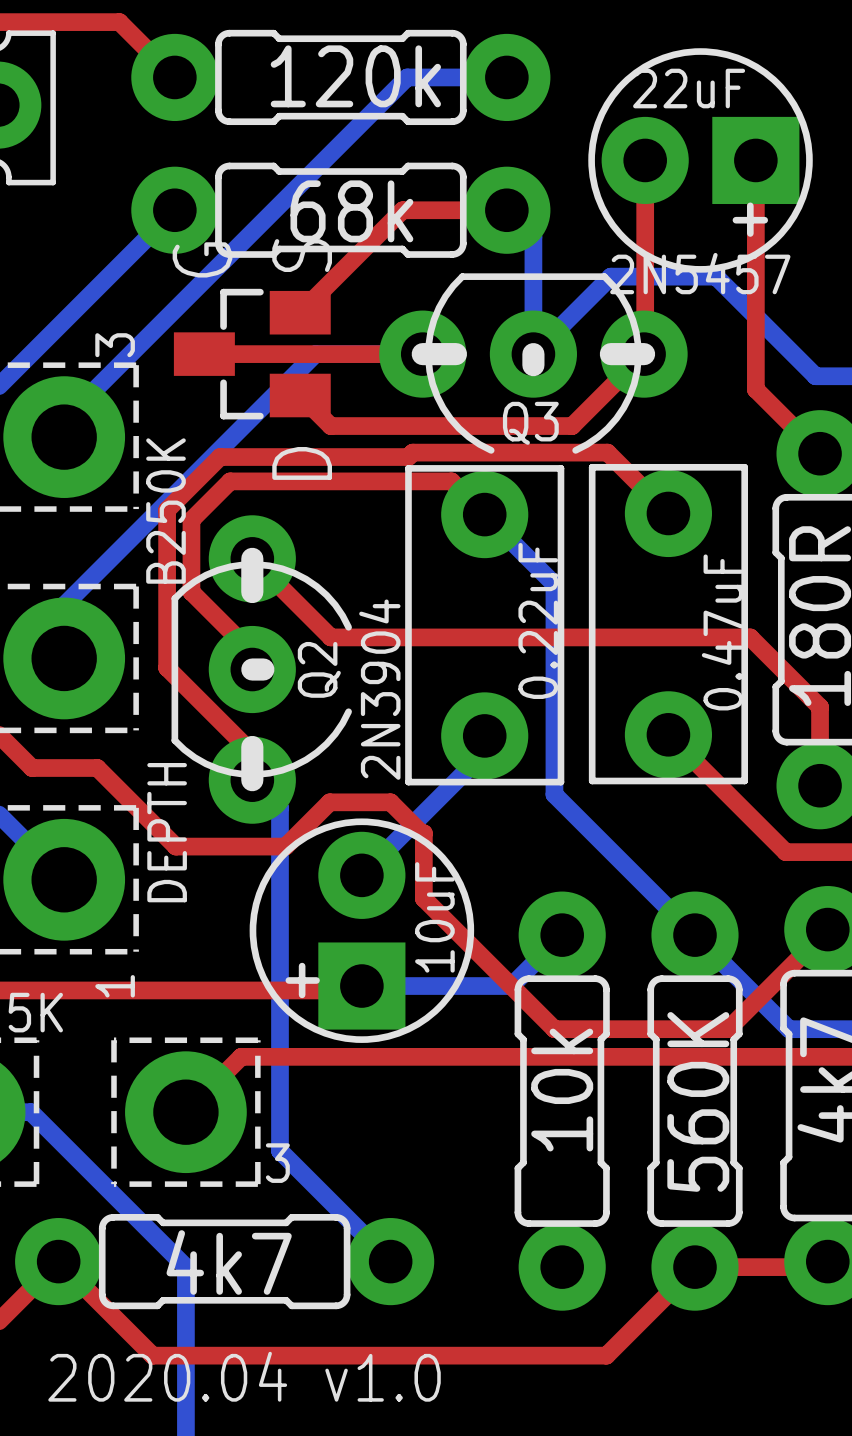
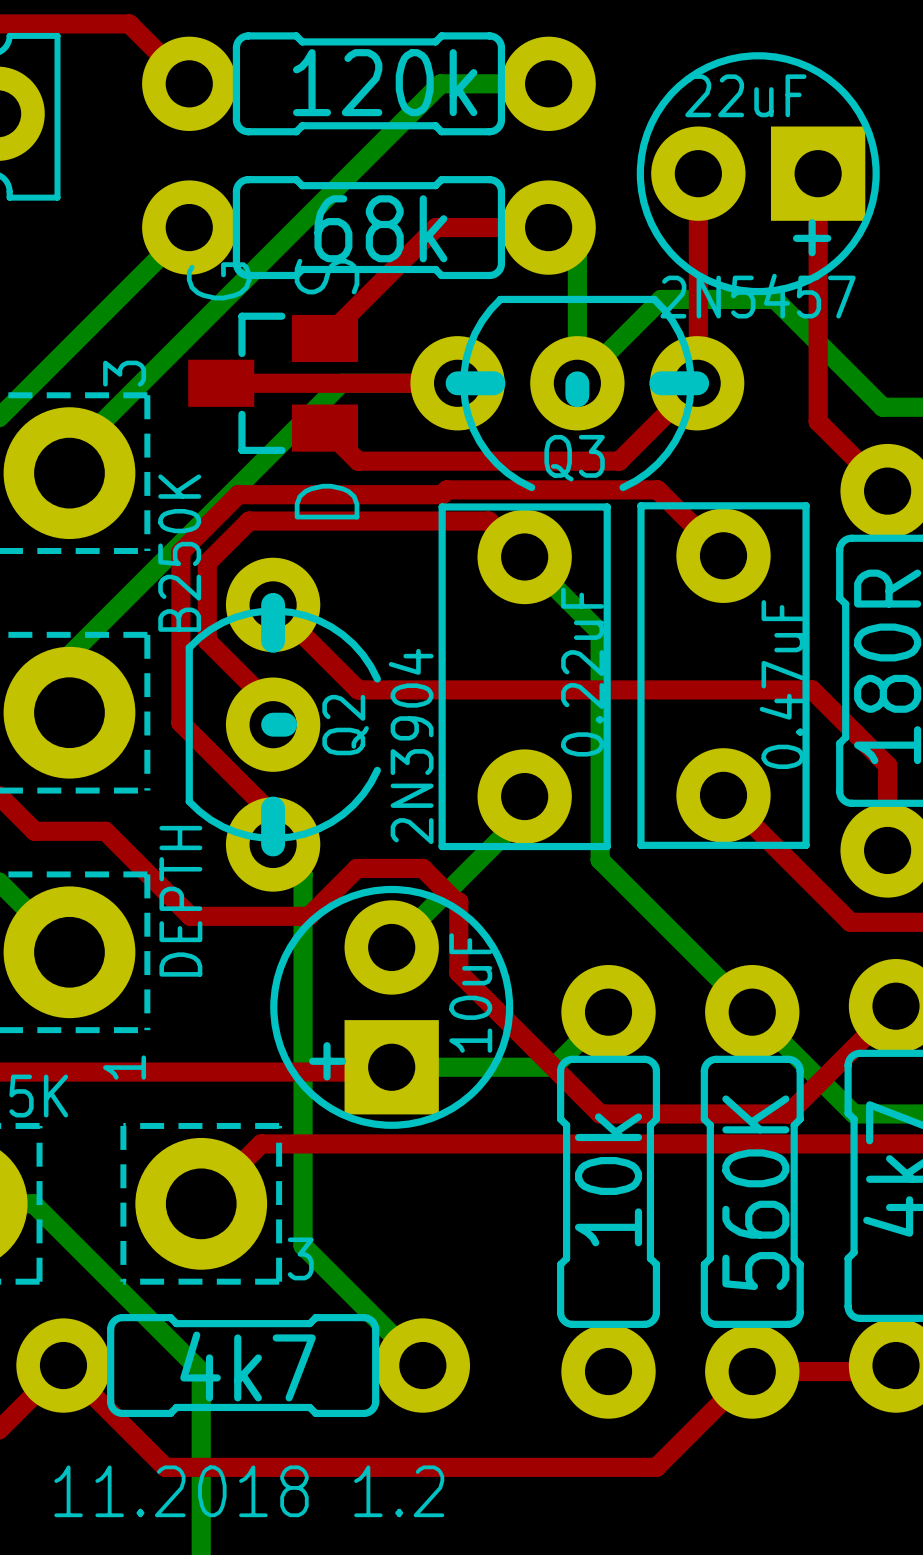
text: 2020.04 v1.0 (244, 1376) -> 11.2018 1.2 (249, 1491)

